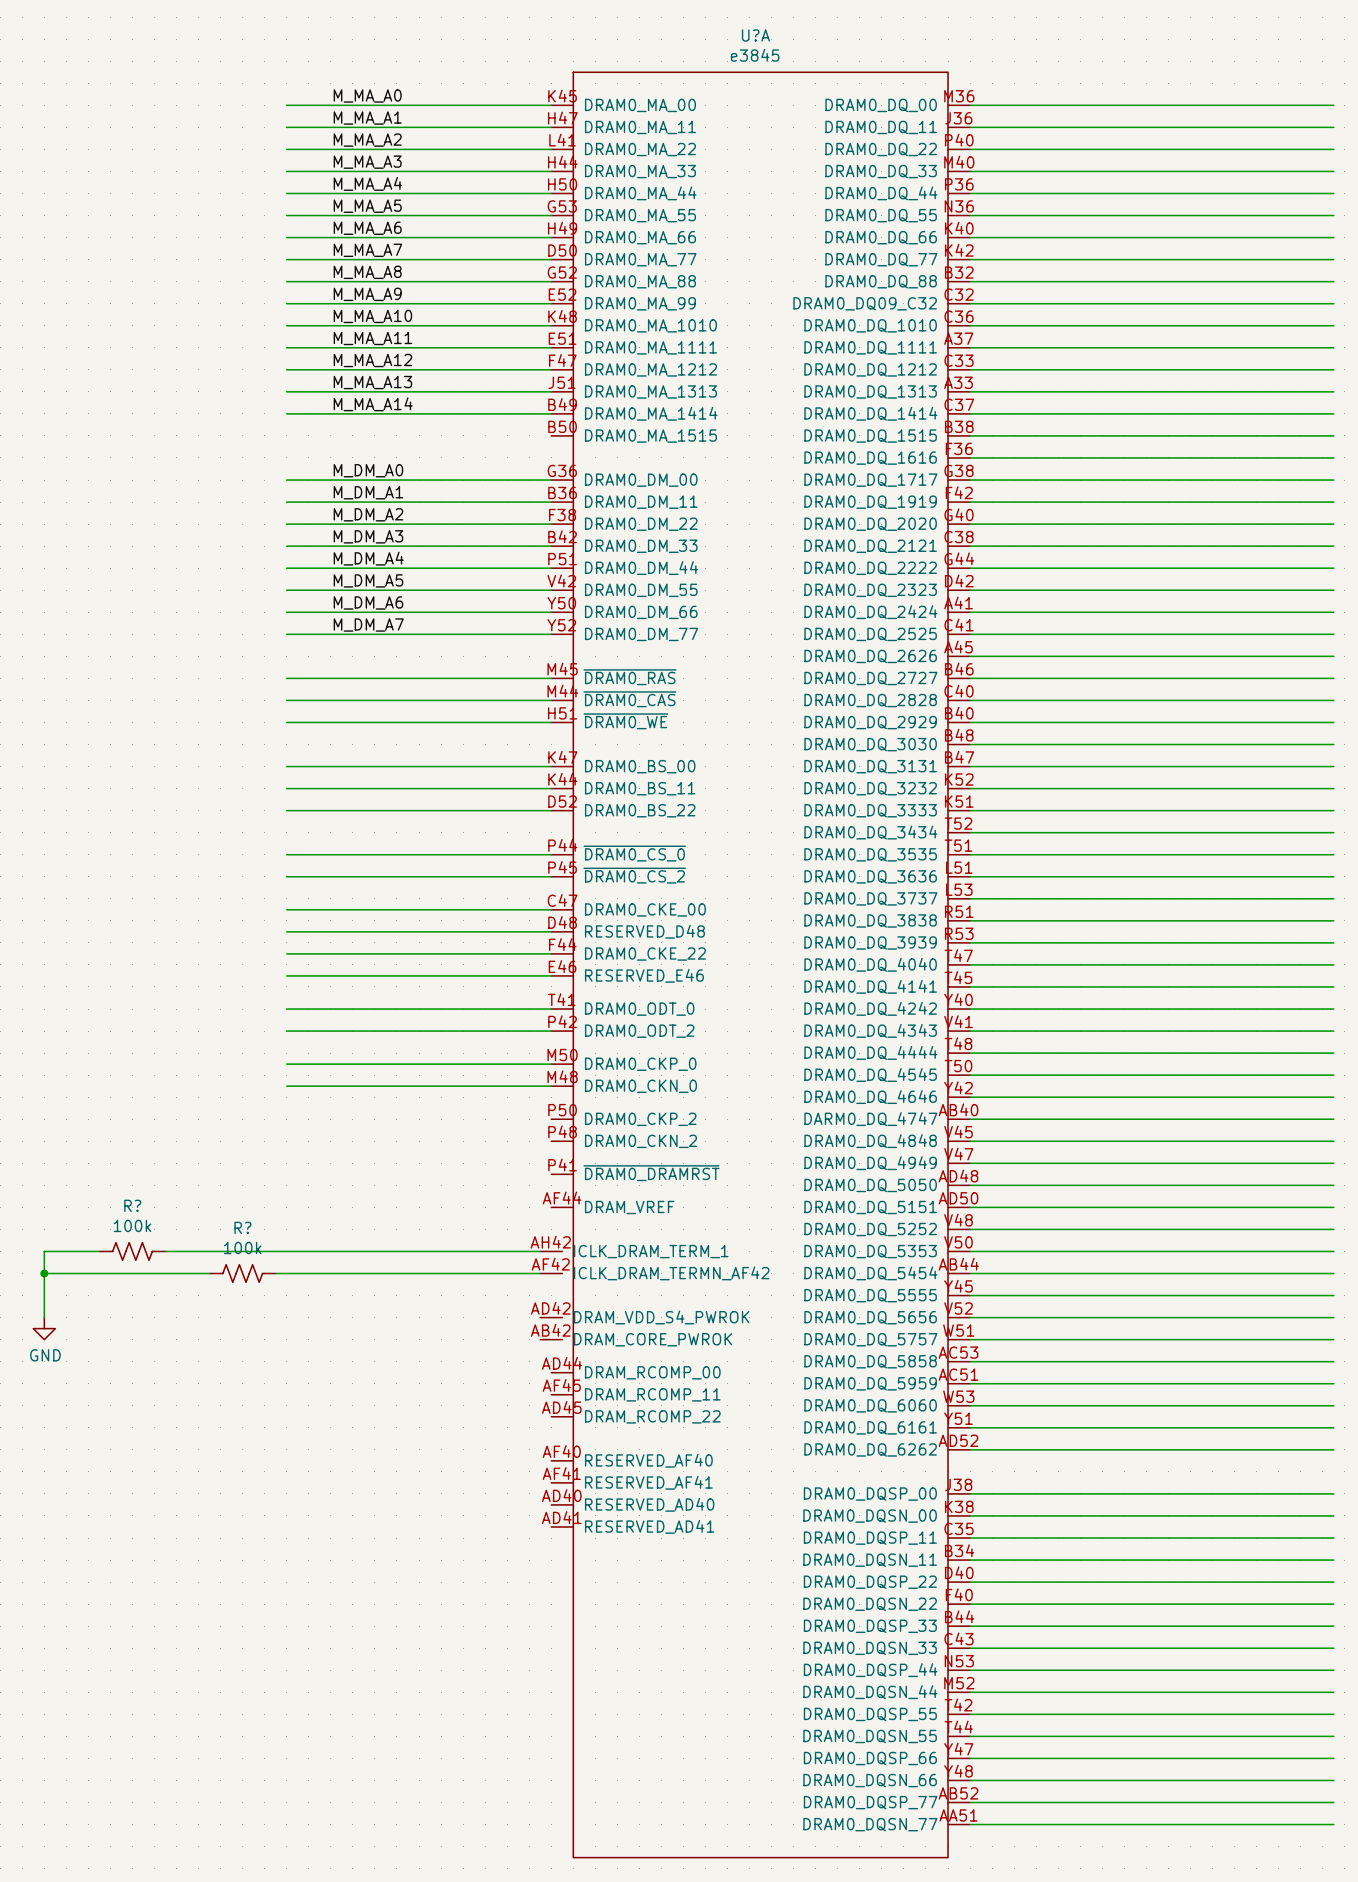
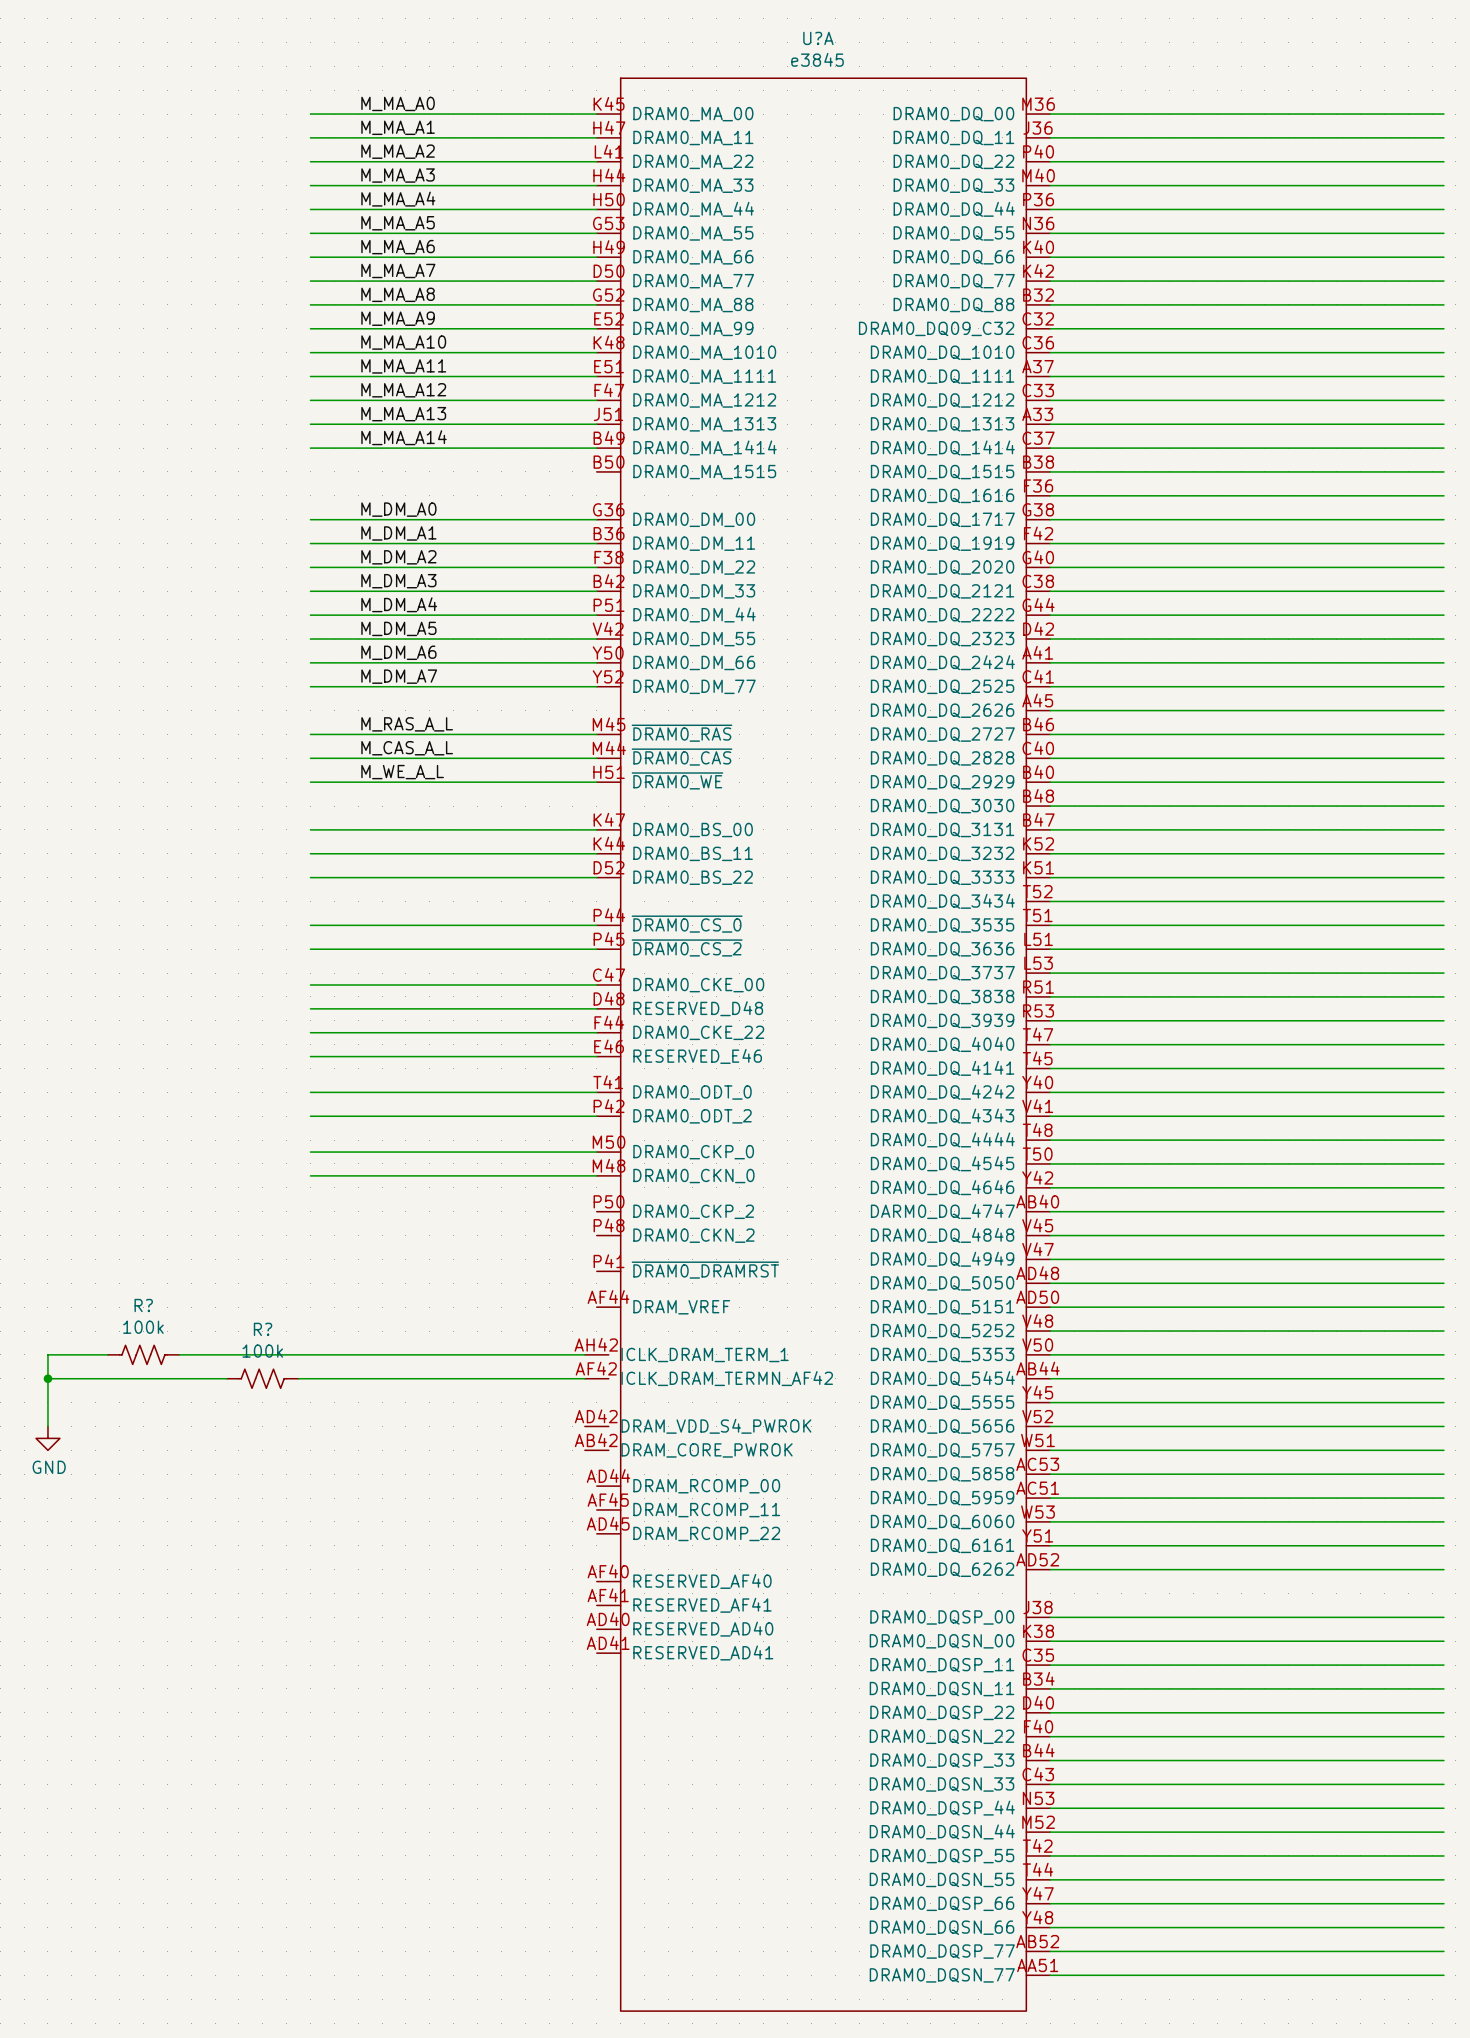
label: none -> M_RAS_A_L (407, 724)
label: none -> M_CAS_A_L (407, 748)
label: none -> M_WE_A_L (402, 772)

